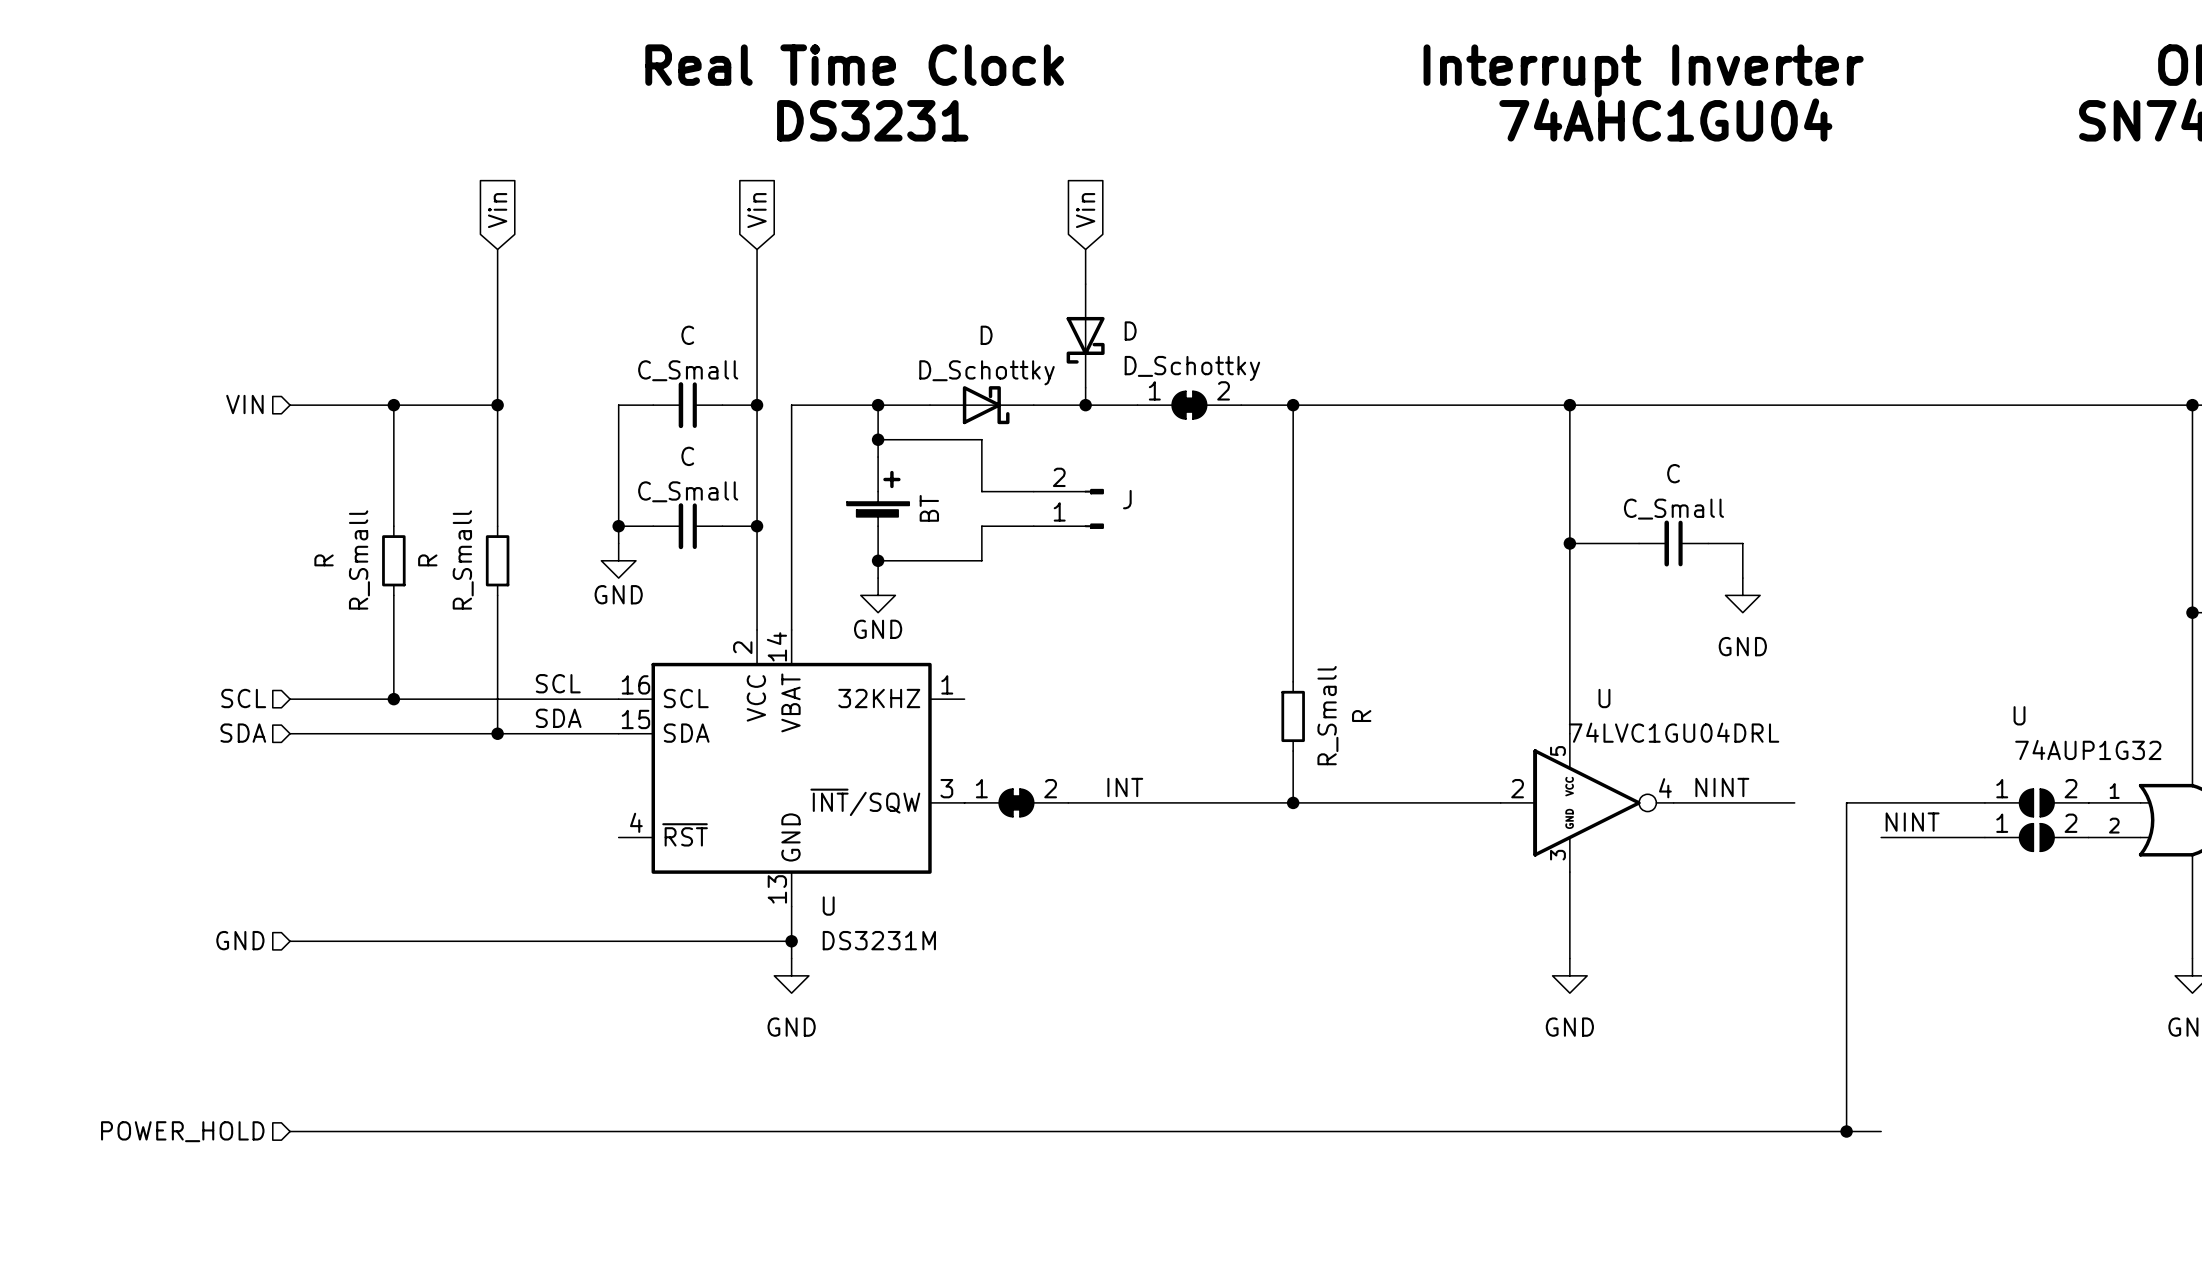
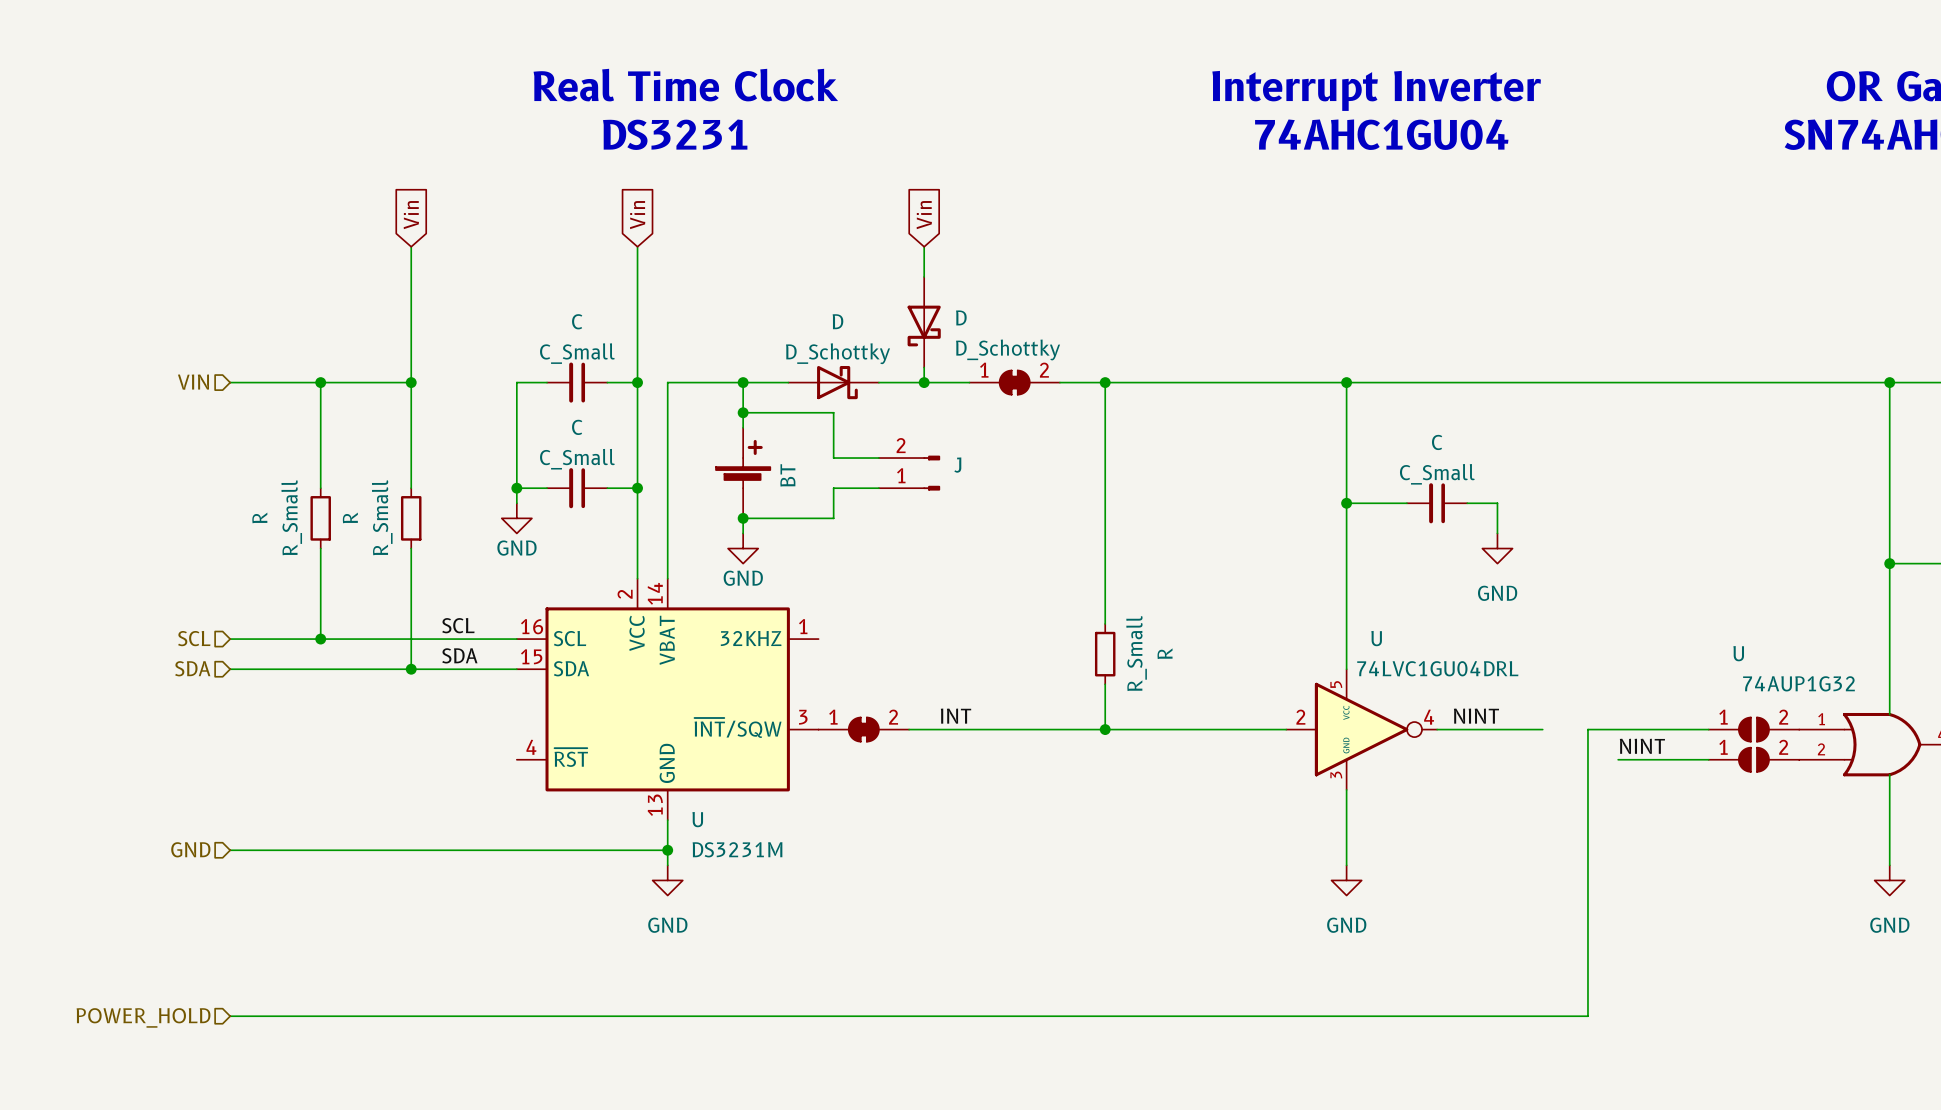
wire: (1846, 1131) (1881, 1131) -> none
junction: (1846, 1131) -> none

